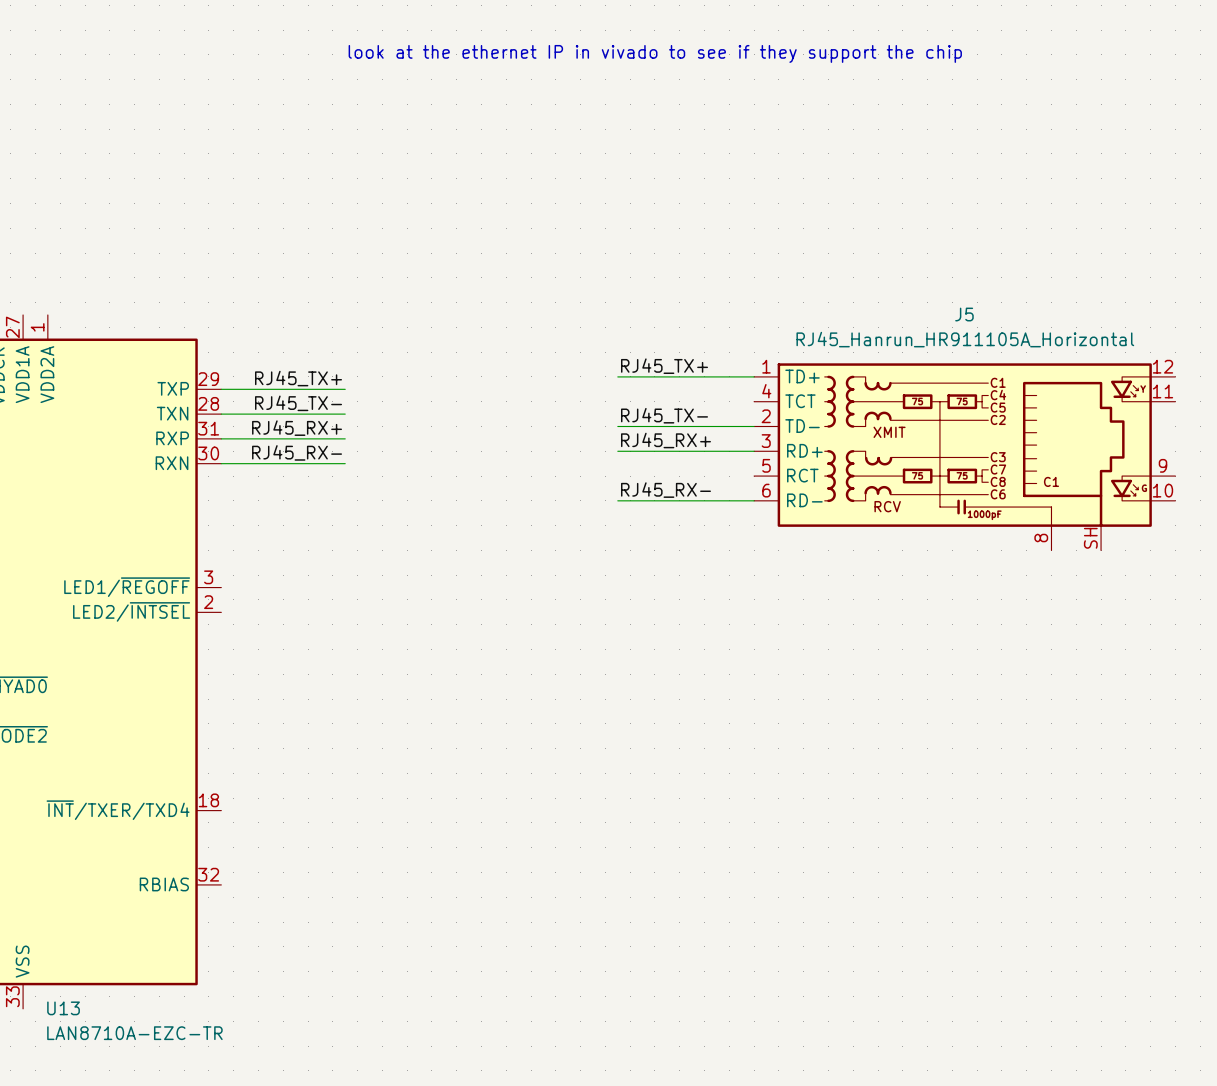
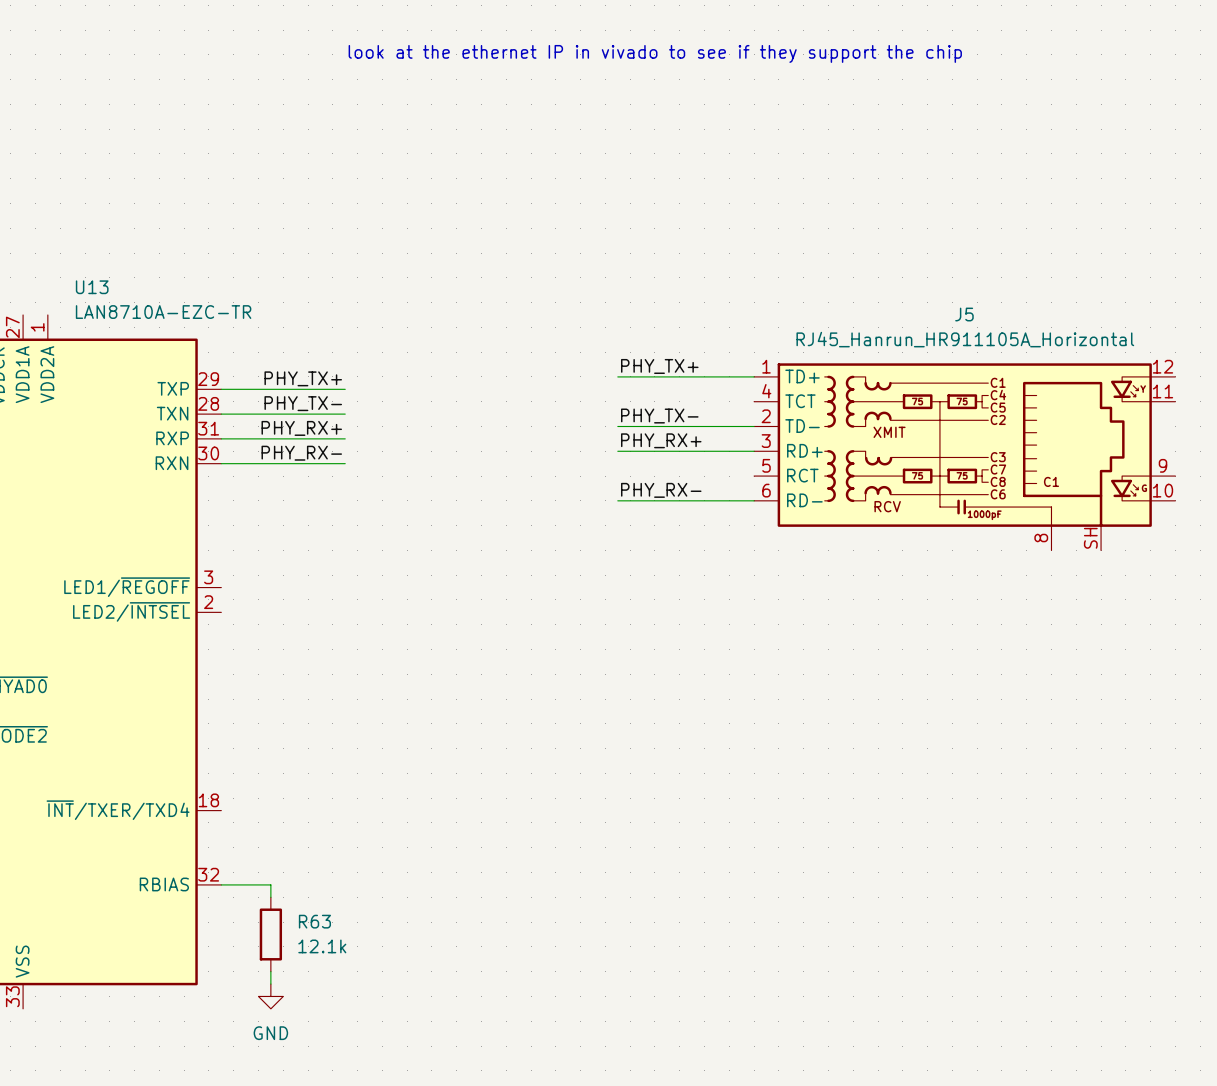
label: RJ45_TX+ (664, 366) -> PHY_TX+ (659, 366)
label: RJ45_TX+ (298, 378) -> PHY_TX+ (303, 378)
label: RJ45_TX- (298, 403) -> PHY_TX- (303, 403)
label: RJ45_TX- (664, 415) -> PHY_TX- (659, 416)
label: RJ45_RX+ (297, 428) -> PHY_RX+ (301, 428)
label: RJ45_RX+ (665, 440) -> PHY_RX+ (661, 440)
label: RJ45_RX- (297, 452) -> PHY_RX- (301, 453)
label: RJ45_RX- (665, 490) -> PHY_RX- (661, 490)
wire: none -> (221, 884) (270, 884) (270, 897)
R63: none -> 12.1k (270, 934)
wire: none -> (270, 971) (270, 984)
power symbol: none -> GND (270, 996)
U13 name position: U13 (63, 1008) -> U13 (92, 287)
U13 value position: LAN8710A-EZC-TR (134, 1033) -> LAN8710A-EZC-TR (163, 312)

